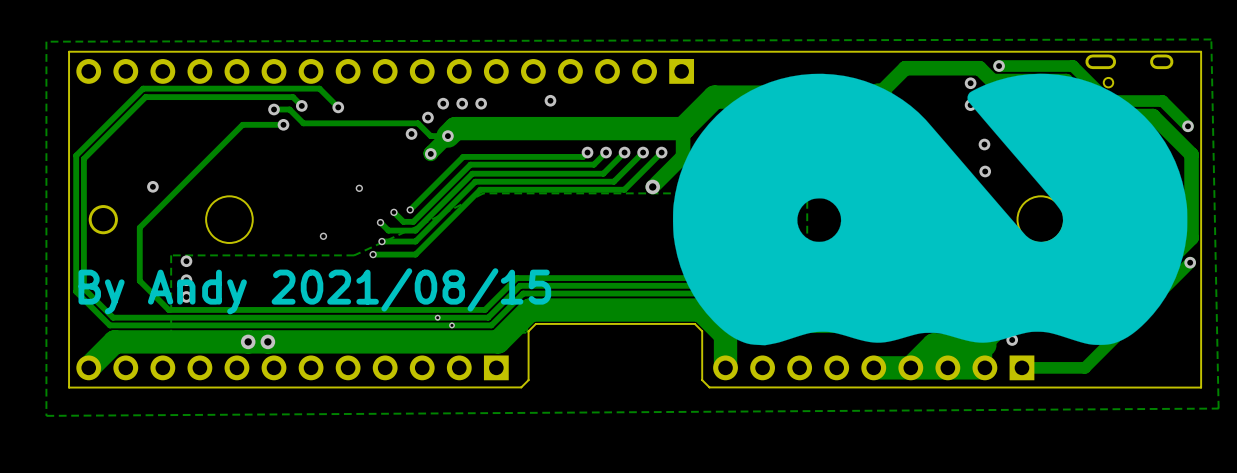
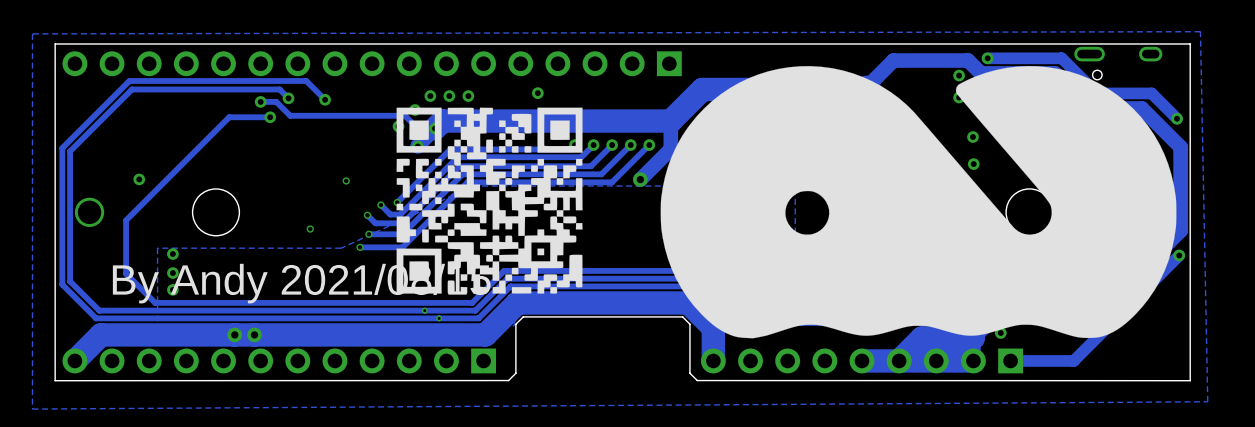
drawing: none -> [396, 107, 583, 294]

